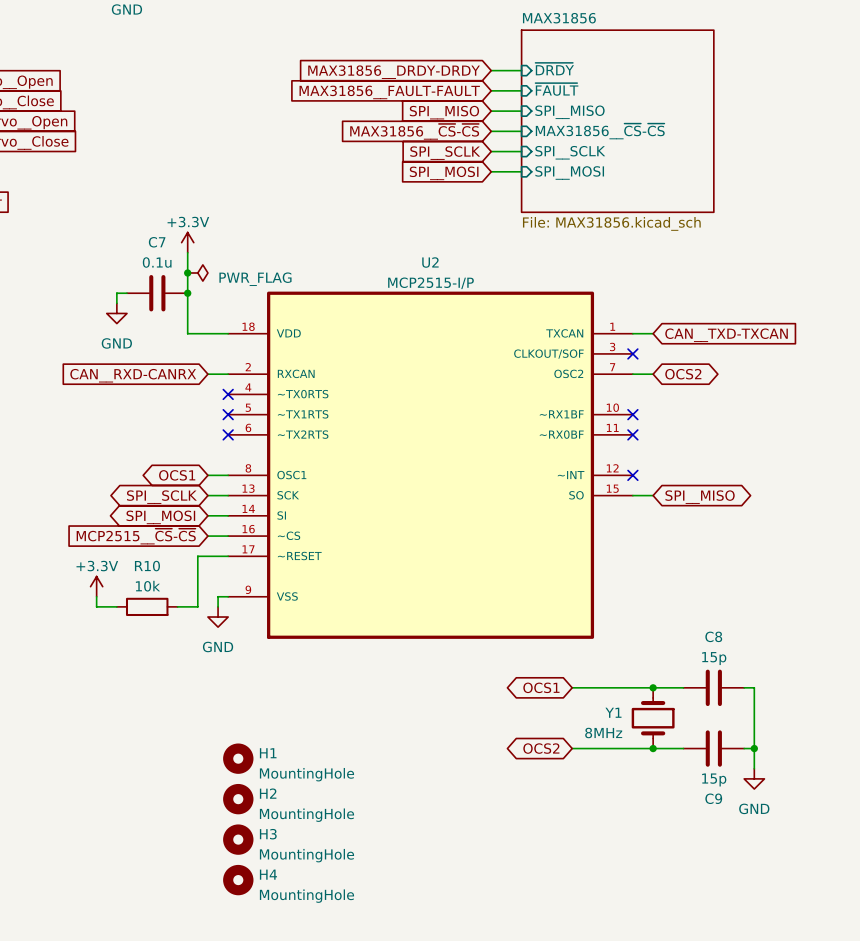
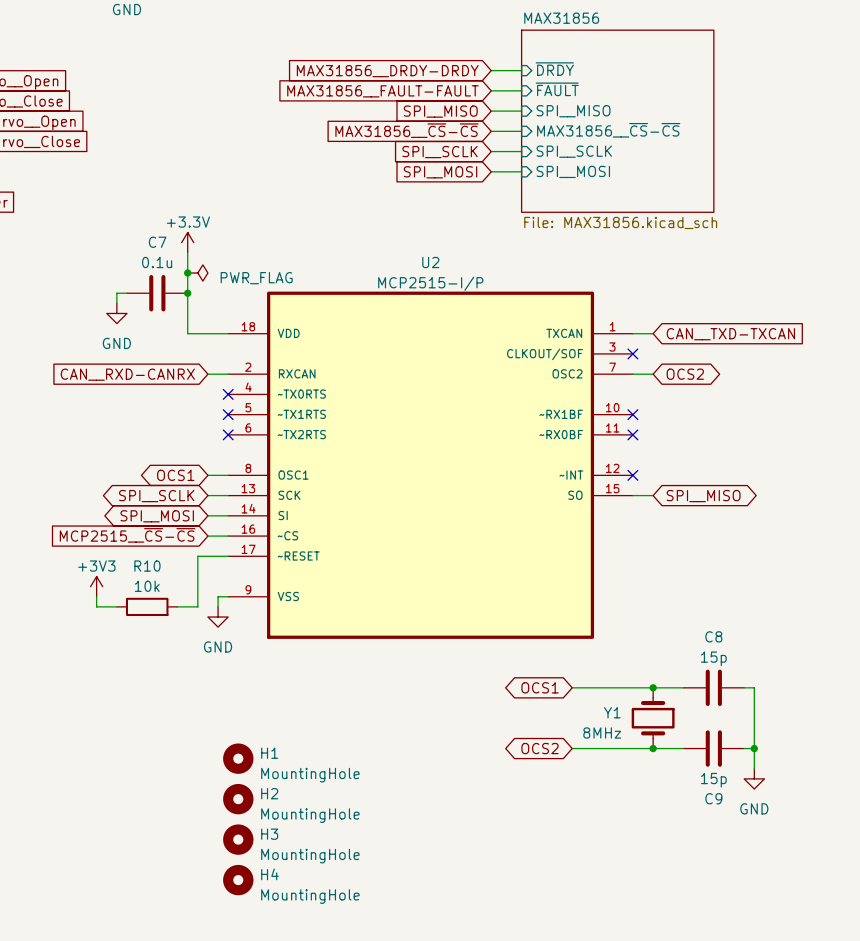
power symbol: +3.3V (96, 586) -> +3V3 (96, 586)

